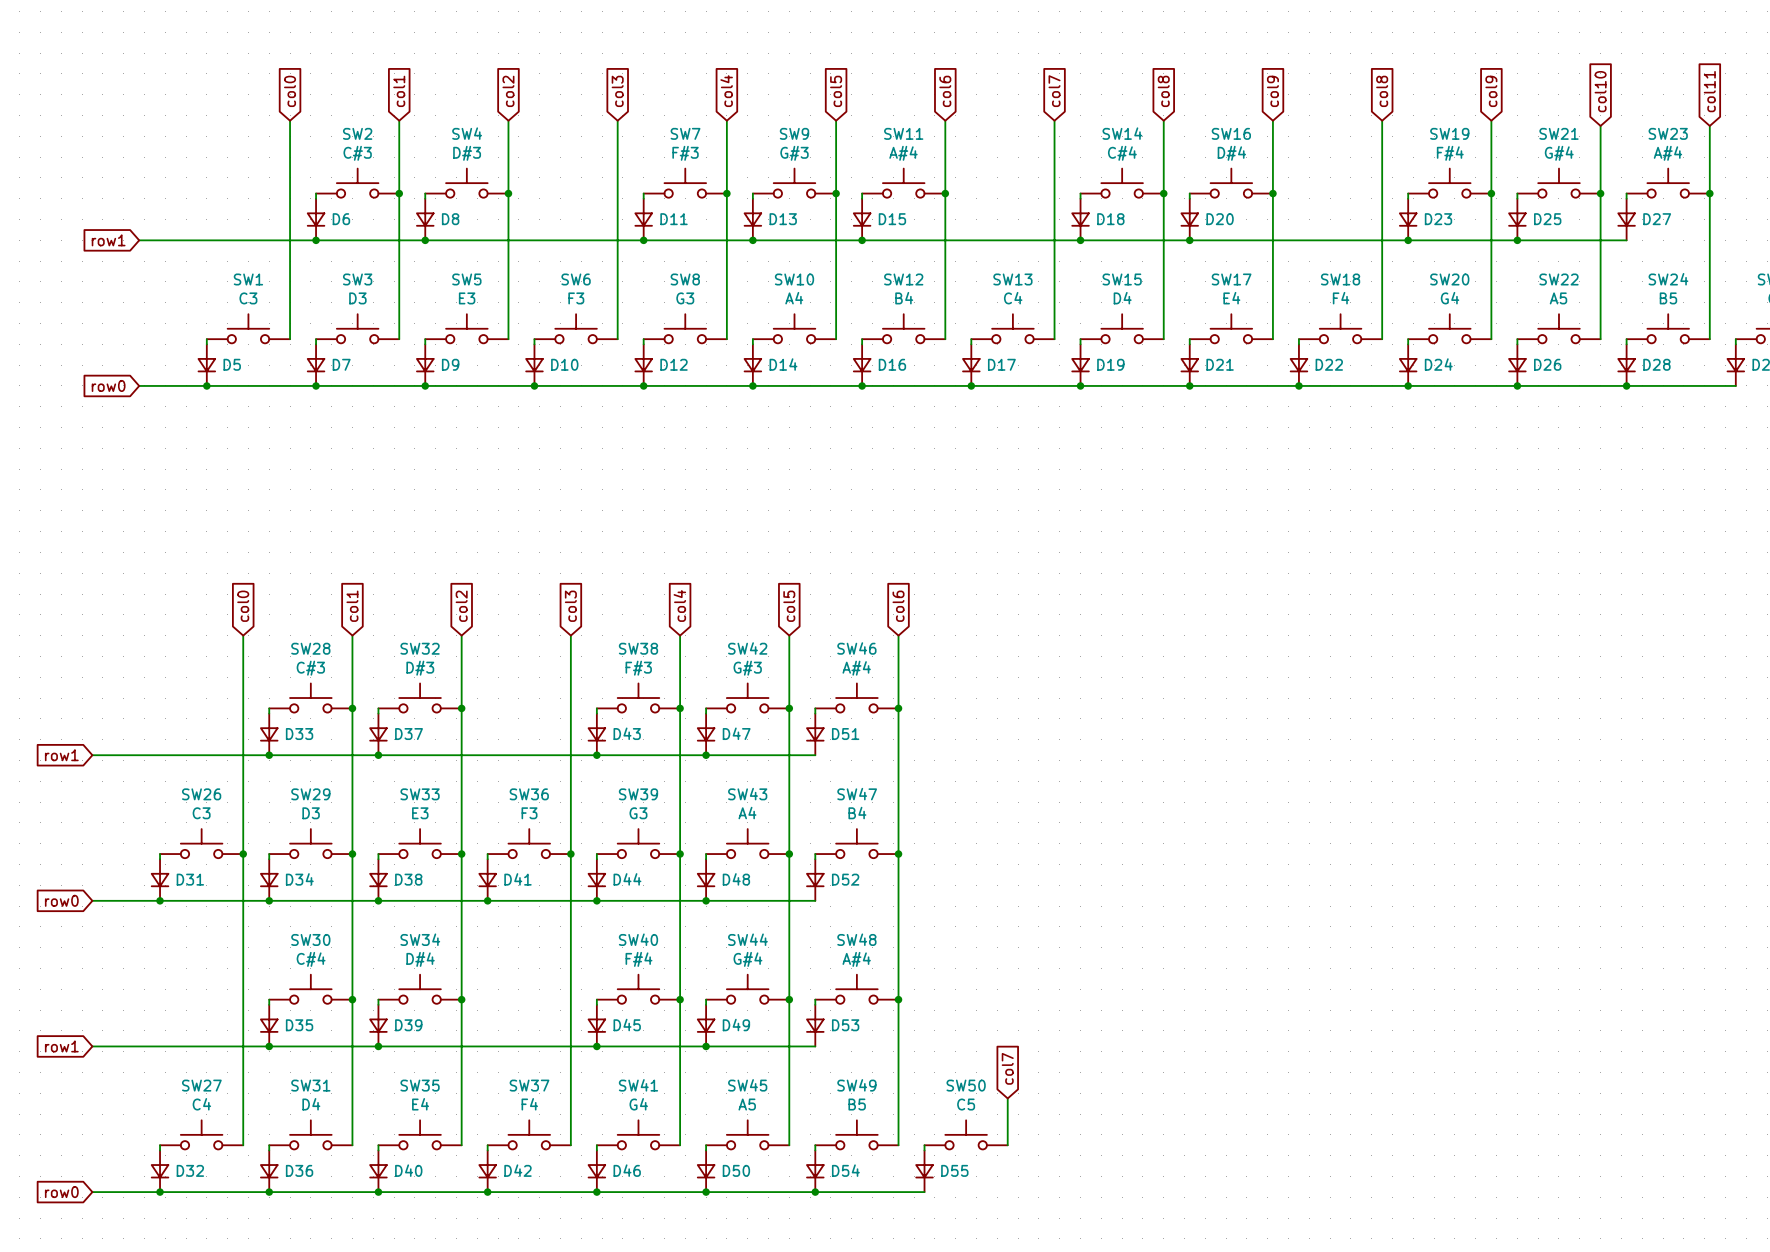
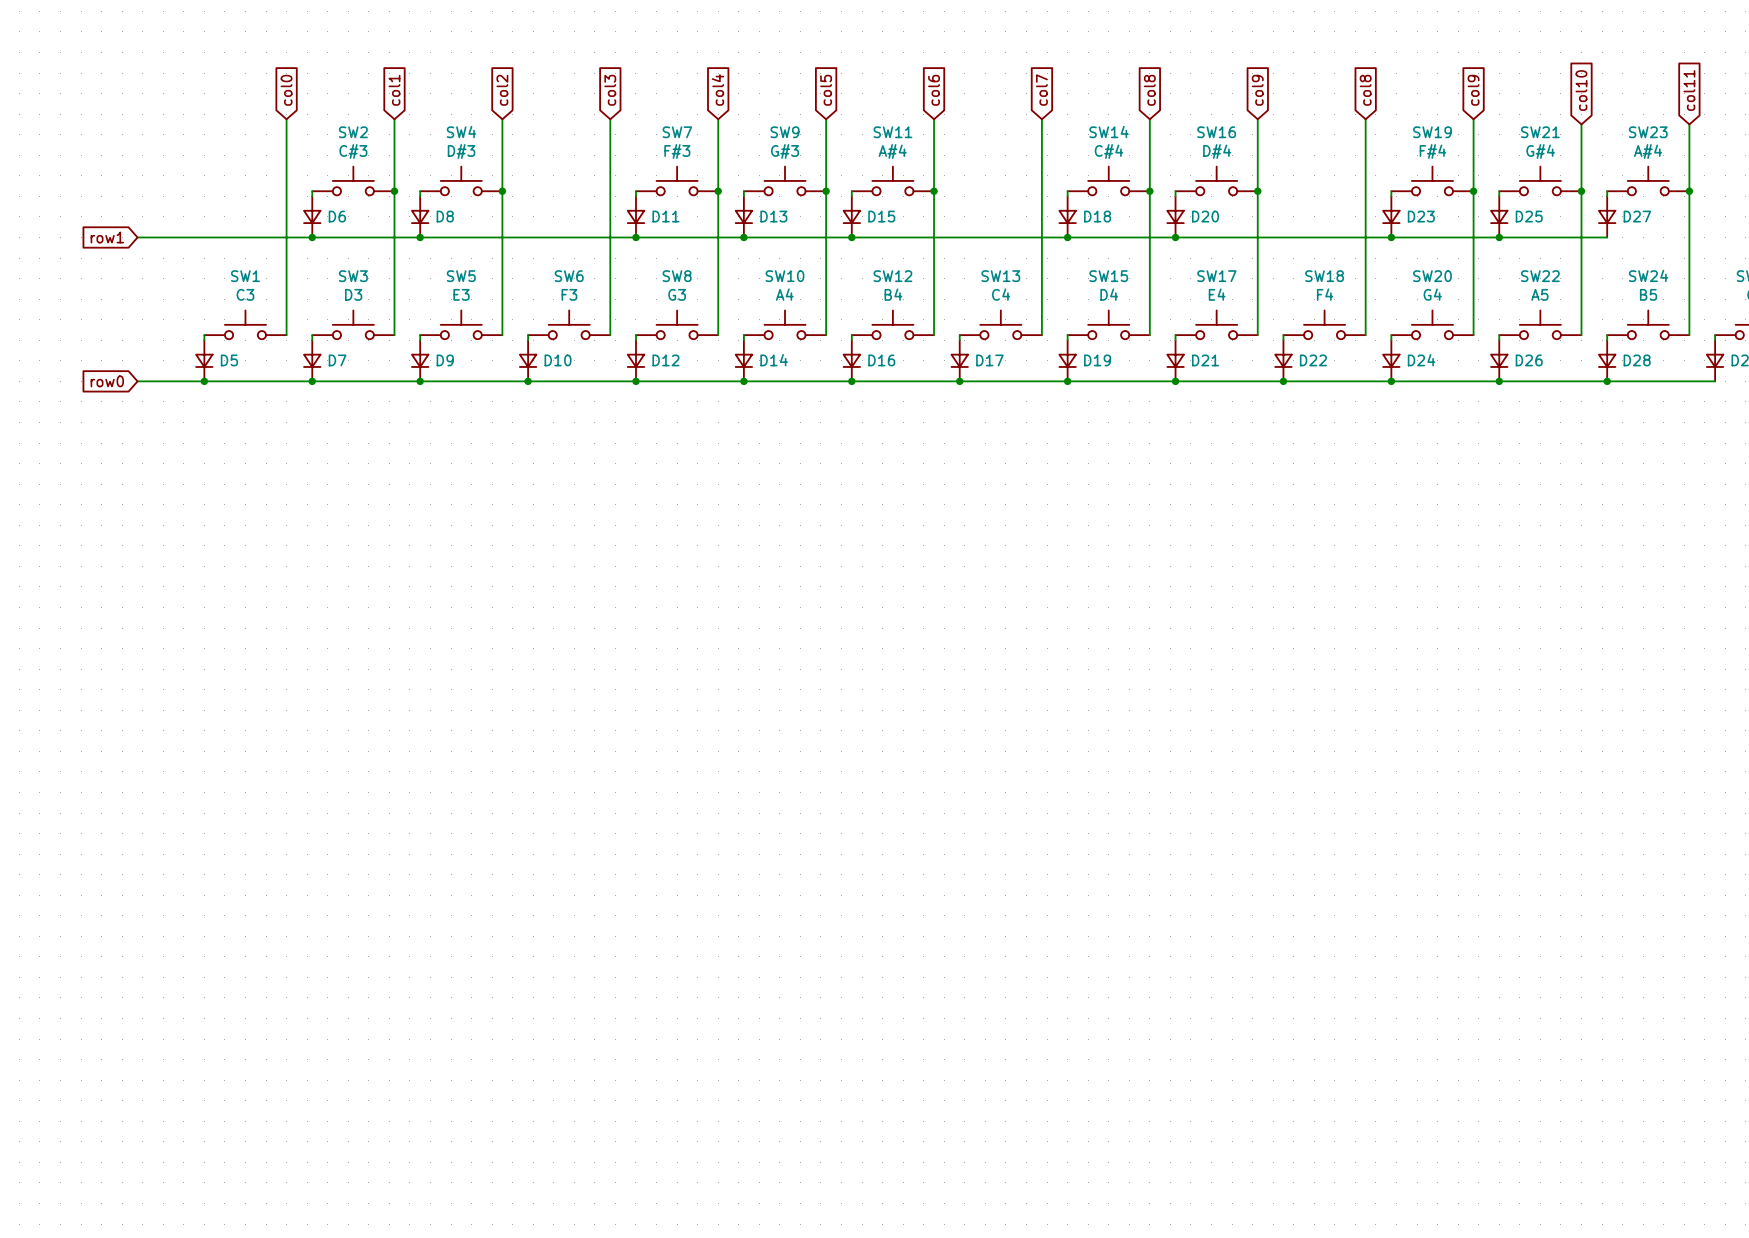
global label: col4 (679, 605) -> none
global label: col0 (243, 606) -> none
global label: col1 (352, 606) -> none
global label: col2 (461, 606) -> none
global label: col3 (570, 606) -> none
global label: col5 (789, 606) -> none
global label: col6 (898, 606) -> none
wire: (243, 635) (243, 1145) -> none
wire: (352, 635) (352, 1145) -> none
wire: (461, 635) (461, 1145) -> none
wire: (570, 635) (570, 1145) -> none
wire: (680, 635) (680, 1145) -> none
wire: (789, 635) (789, 1145) -> none
wire: (898, 635) (898, 1145) -> none
SW28: C#3 (310, 698) -> none
SW32: D#3 (420, 698) -> none
SW38: F#3 (638, 698) -> none
SW42: G#3 (747, 698) -> none
SW46: A#4 (856, 698) -> none
wire: (269, 708) (269, 713) -> none
junction: (352, 708) -> none
wire: (378, 708) (378, 713) -> none
junction: (461, 708) -> none
wire: (596, 708) (596, 713) -> none
junction: (680, 708) -> none
wire: (706, 708) (706, 713) -> none
junction: (789, 708) -> none
wire: (815, 708) (815, 713) -> none
junction: (898, 708) -> none
D33: (269, 734) -> none
D37: (378, 734) -> none
D43: (596, 734) -> none
D47: (706, 734) -> none
D51: (815, 734) -> none
global label: row1 (61, 755) -> none
wire: (92, 755) (815, 755) -> none
junction: (269, 755) -> none
junction: (378, 755) -> none
junction: (596, 755) -> none
junction: (706, 755) -> none
SW26: C3 (201, 843) -> none
SW29: D3 (310, 843) -> none
SW33: E3 (420, 843) -> none
SW36: F3 (529, 843) -> none
SW39: G3 (638, 843) -> none
SW43: A4 (747, 843) -> none
SW47: B4 (856, 843) -> none
wire: (160, 854) (160, 859) -> none
junction: (243, 854) -> none
wire: (269, 854) (269, 859) -> none
junction: (352, 854) -> none
wire: (378, 854) (378, 859) -> none
junction: (461, 854) -> none
wire: (487, 854) (487, 859) -> none
junction: (570, 854) -> none
wire: (596, 854) (596, 859) -> none
junction: (680, 854) -> none
wire: (706, 854) (706, 859) -> none
junction: (789, 854) -> none
wire: (815, 854) (815, 859) -> none
junction: (898, 854) -> none
D31: (160, 880) -> none
D34: (269, 880) -> none
D38: (378, 880) -> none
D41: (487, 880) -> none
D44: (596, 880) -> none
D48: (706, 880) -> none
D52: (815, 880) -> none
global label: row0 (61, 900) -> none
wire: (92, 900) (815, 900) -> none
junction: (160, 900) -> none
junction: (269, 900) -> none
junction: (378, 900) -> none
junction: (487, 900) -> none
junction: (596, 900) -> none
junction: (706, 900) -> none
SW30: C#4 (310, 989) -> none
SW34: D#4 (420, 989) -> none
SW40: F#4 (638, 989) -> none
SW44: G#4 (747, 989) -> none
SW48: A#4 (856, 989) -> none
wire: (269, 999) (269, 1004) -> none
junction: (352, 999) -> none
wire: (378, 999) (378, 1004) -> none
junction: (461, 999) -> none
wire: (596, 999) (596, 1004) -> none
junction: (680, 999) -> none
wire: (706, 999) (706, 1004) -> none
junction: (789, 999) -> none
wire: (815, 999) (815, 1004) -> none
junction: (898, 999) -> none
D35: (269, 1025) -> none
D39: (378, 1025) -> none
D45: (596, 1025) -> none
D49: (706, 1025) -> none
D53: (815, 1025) -> none
global label: row1 (61, 1046) -> none
wire: (92, 1046) (815, 1046) -> none
junction: (269, 1046) -> none
junction: (378, 1046) -> none
junction: (596, 1046) -> none
junction: (706, 1046) -> none
global label: col7 (1007, 1068) -> none
wire: (1007, 1098) (1007, 1145) -> none
SW27: C4 (201, 1134) -> none
SW31: D4 (310, 1134) -> none
SW35: E4 (420, 1134) -> none
SW37: F4 (529, 1134) -> none
SW41: G4 (638, 1134) -> none
SW45: A5 (747, 1134) -> none
SW49: B5 (856, 1134) -> none
SW50: C5 (966, 1134) -> none
wire: (160, 1145) (160, 1150) -> none
wire: (269, 1145) (269, 1150) -> none
wire: (378, 1145) (378, 1150) -> none
wire: (487, 1145) (487, 1150) -> none
wire: (596, 1145) (596, 1150) -> none
wire: (706, 1145) (706, 1150) -> none
wire: (815, 1145) (815, 1150) -> none
wire: (924, 1145) (924, 1150) -> none
D32: (160, 1171) -> none
D36: (269, 1171) -> none
D40: (378, 1171) -> none
D42: (487, 1171) -> none
D46: (596, 1171) -> none
D50: (706, 1171) -> none
D54: (815, 1171) -> none
D55: (924, 1171) -> none
global label: row0 (61, 1192) -> none
wire: (92, 1192) (924, 1192) -> none
junction: (160, 1192) -> none
junction: (269, 1192) -> none
junction: (378, 1192) -> none
junction: (487, 1192) -> none
junction: (596, 1192) -> none
junction: (706, 1192) -> none
junction: (815, 1192) -> none

